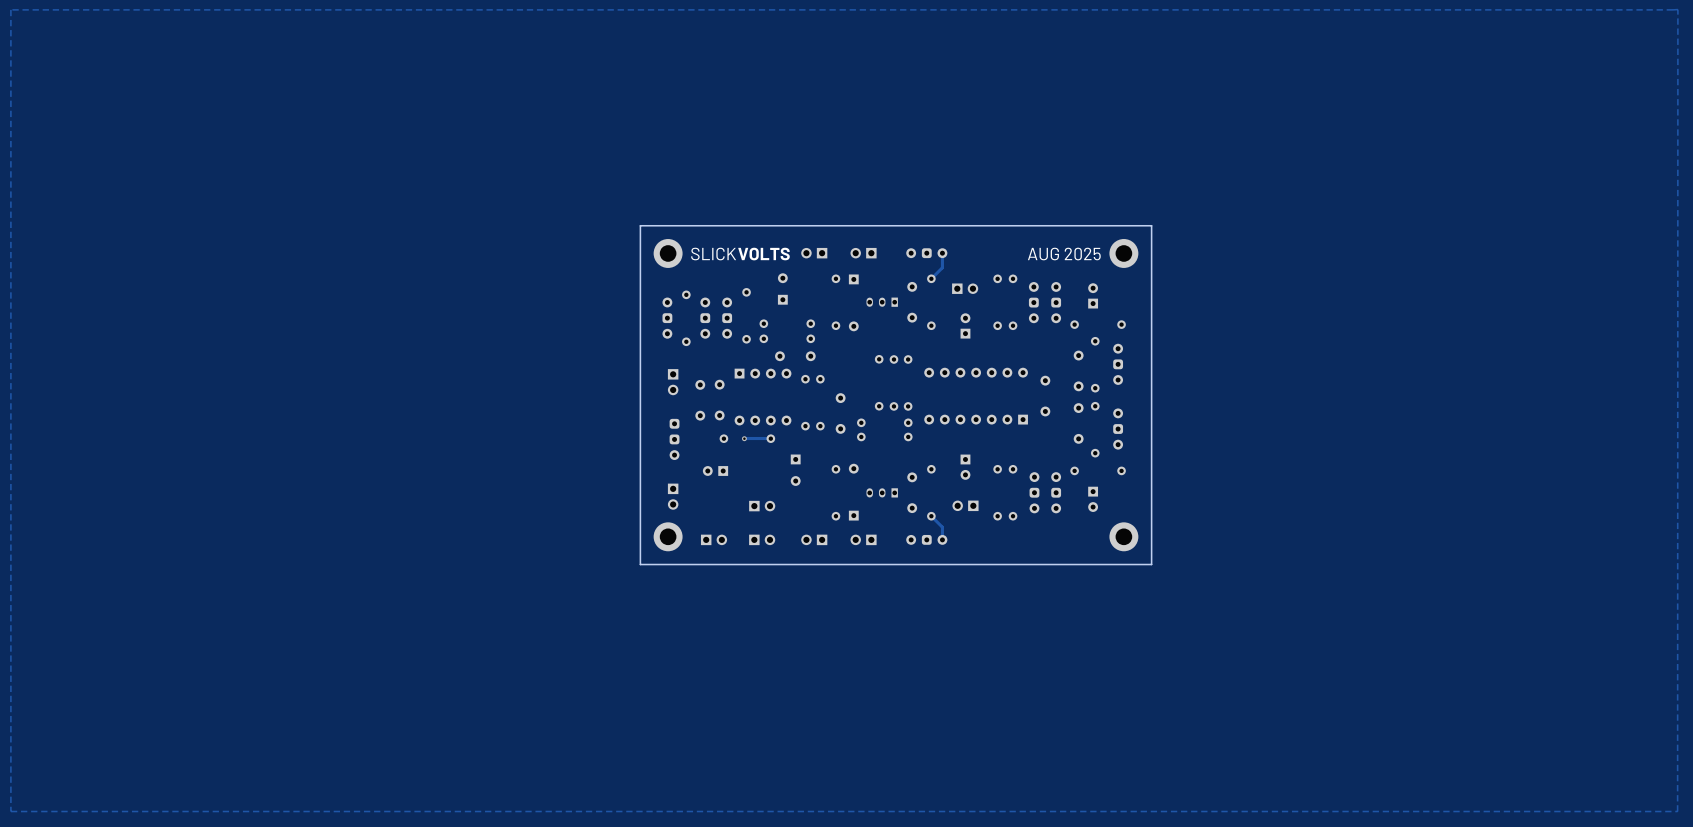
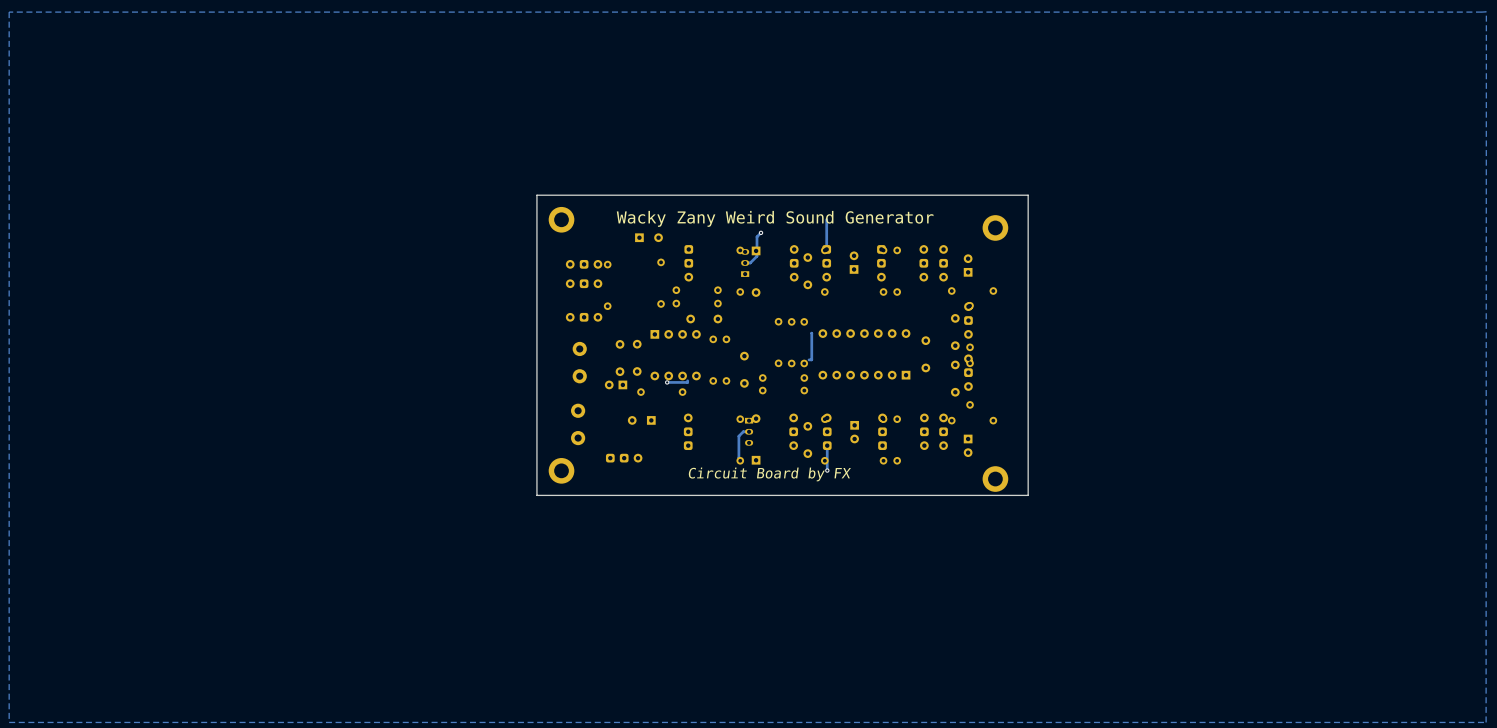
board edge: (1151, 225) (640, 225) (640, 564) (1151, 564) (1151, 225) -> (1028, 195) (1028, 495) (536, 495) (536, 195) (1028, 195)
text: none -> Wacky Zany Weird Sound Generator (775, 218)
track: none -> (826, 219) (826, 249)
part position: (668, 253) -> (561, 219)
part: (814, 253) -> none
part: (863, 253) -> none
part rotation: 0° (926, 253) -> 90° clockwise (794, 263)
part position: (926, 253) -> (794, 263)
track: (942, 253) (942, 267) (931, 278) -> none
text: SLICK (713, 254) -> none
text: VOLTS (764, 254) -> none
text: AUG 2025 (1064, 254) -> none
track: none -> (761, 232) (757, 236) (757, 256) (750, 262) (745, 262)
via: none -> (761, 232)
part footprint: [952, 283, 979, 294] -> [849, 251, 859, 274]
part rotation: 0° (782, 288) -> 90° clockwise (648, 237)
part position: (782, 288) -> (648, 237)
part: none -> (688, 263)
part: none -> (826, 263)
part: none -> (881, 263)
part: none -> (923, 263)
part: none -> (943, 263)
part: none -> (584, 264)
part rotation: 0° (882, 302) -> 90° clockwise (745, 262)
part position: (882, 302) -> (745, 262)
part: (1033, 302) -> none
part: (1056, 302) -> none
part rotation: 0° (667, 318) -> 90° clockwise (584, 283)
part: (705, 318) -> none
part: (727, 318) -> none
part: (965, 325) -> none
part: none -> (584, 317)
part position: (1118, 364) -> (968, 320)
track: none -> (811, 333) (811, 359) (809, 359)
part: (673, 382) -> none
part: none -> (579, 362)
track: none -> (687, 380) (687, 382) (667, 382)
part position: (1118, 429) -> (968, 372)
via position: (744, 438) -> (667, 382)
track: (770, 438) (744, 438) -> none
part: (674, 439) -> none
part position: (965, 467) -> (854, 432)
part position: (715, 470) -> (616, 384)
part rotation: 0° (795, 470) -> 90° clockwise (641, 420)
part position: (795, 470) -> (641, 420)
part: none -> (578, 424)
part: none -> (688, 431)
track: none -> (749, 431) (743, 431) (738, 436) (738, 457) (741, 460)
part: none -> (827, 431)
part: none -> (882, 431)
part: none -> (924, 431)
part: none -> (943, 431)
part rotation: 0° (882, 492) -> 90° counterclockwise (749, 431)
part position: (882, 492) -> (749, 431)
part: (1034, 492) -> none
part: (1056, 492) -> none
part: (673, 496) -> none
track: none -> (827, 445) (827, 470)
part: (965, 505) -> none
part: (762, 506) -> none
part: none -> (624, 458)
track: (931, 516) (942, 527) (942, 539) -> none
via: none -> (827, 470)
text: none -> Circuit Board by FX (769, 474)
part position: (668, 536) -> (561, 470)
part: (714, 539) -> none
part: (762, 539) -> none
part: (814, 539) -> none
part: (863, 539) -> none
part rotation: 0° (926, 539) -> 90° clockwise (793, 431)
part position: (926, 539) -> (793, 431)

